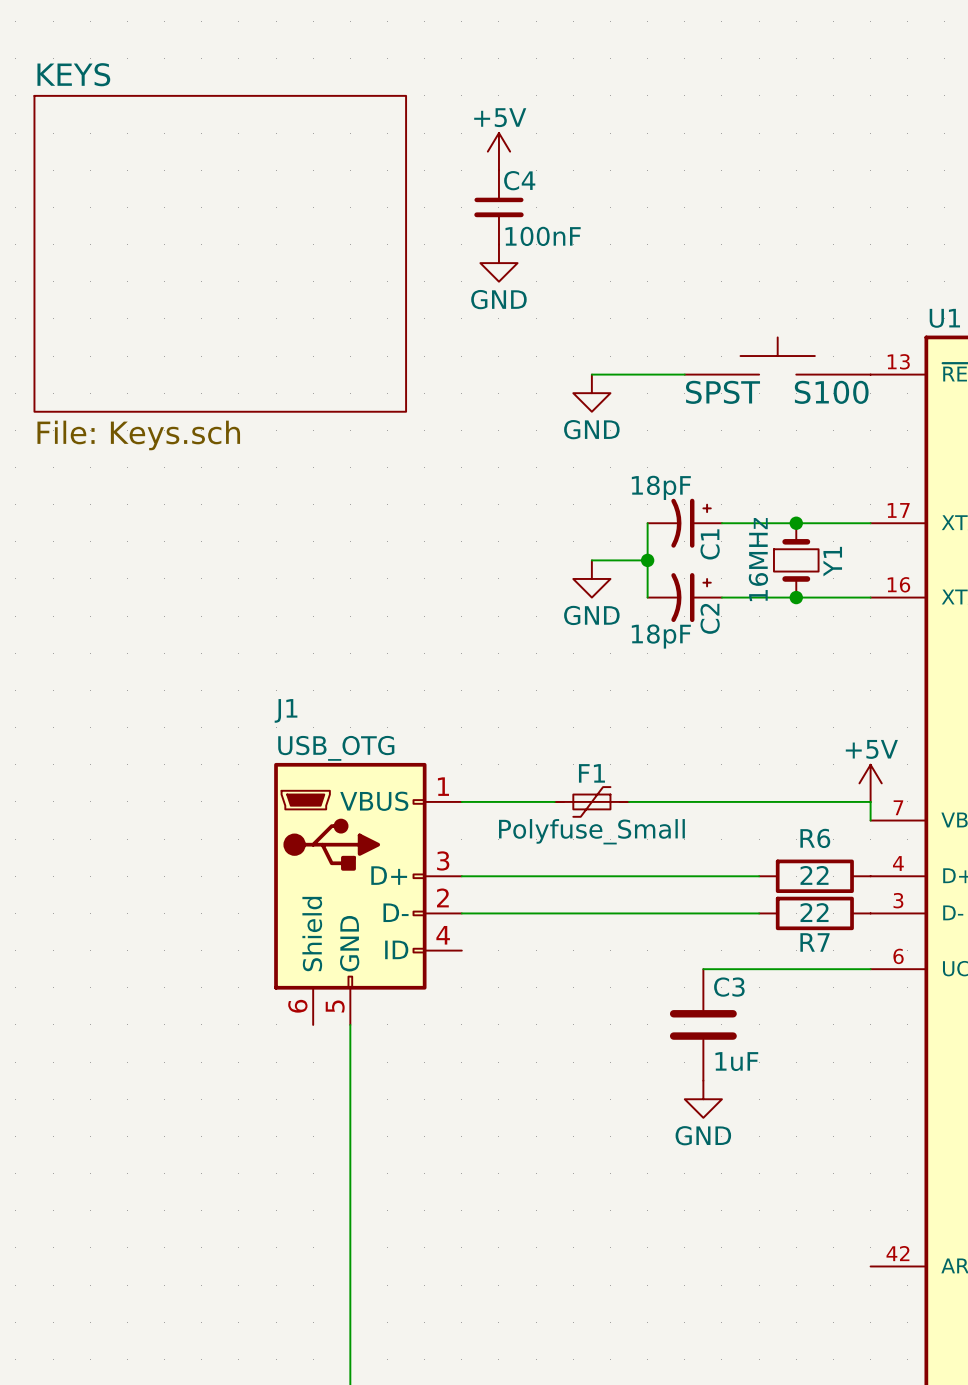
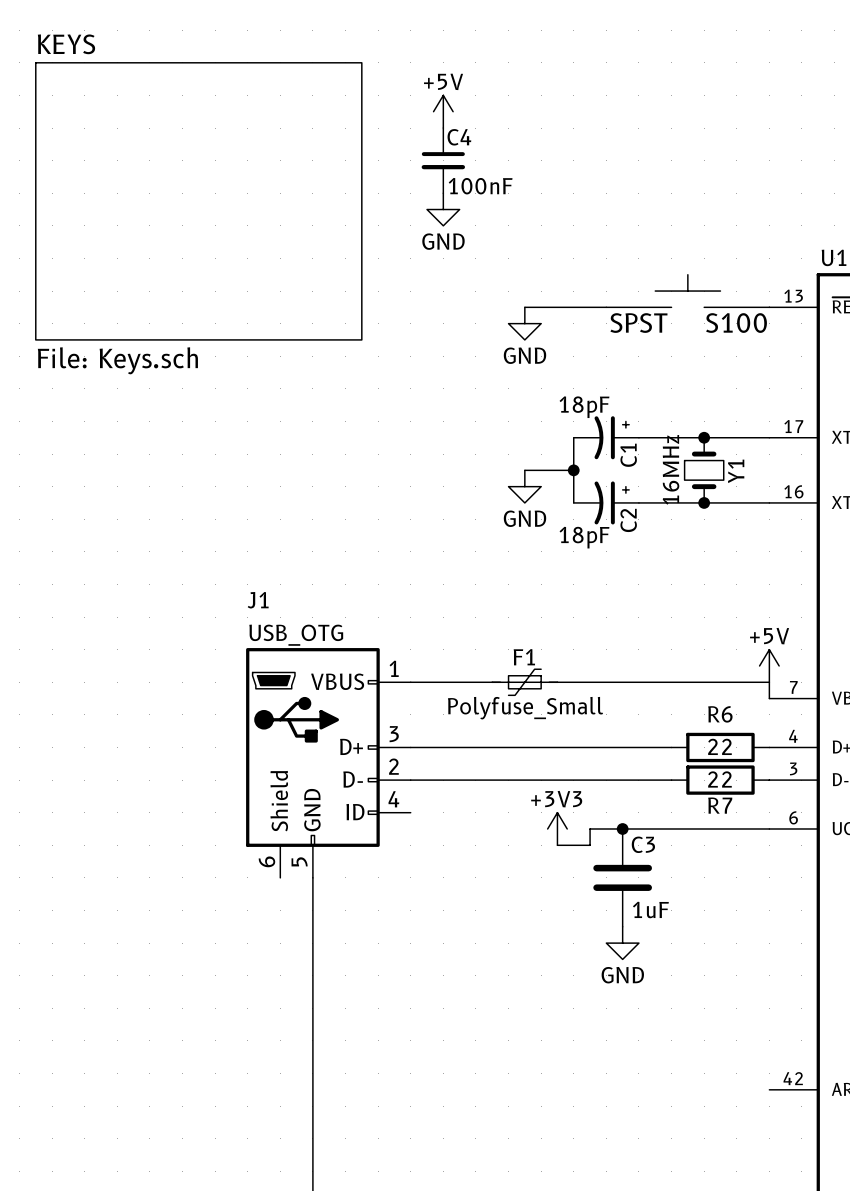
power symbol: none -> +3V3 (557, 828)
wire: none -> (622, 828) (590, 828) (590, 845) (557, 845)
junction: none -> (622, 828)

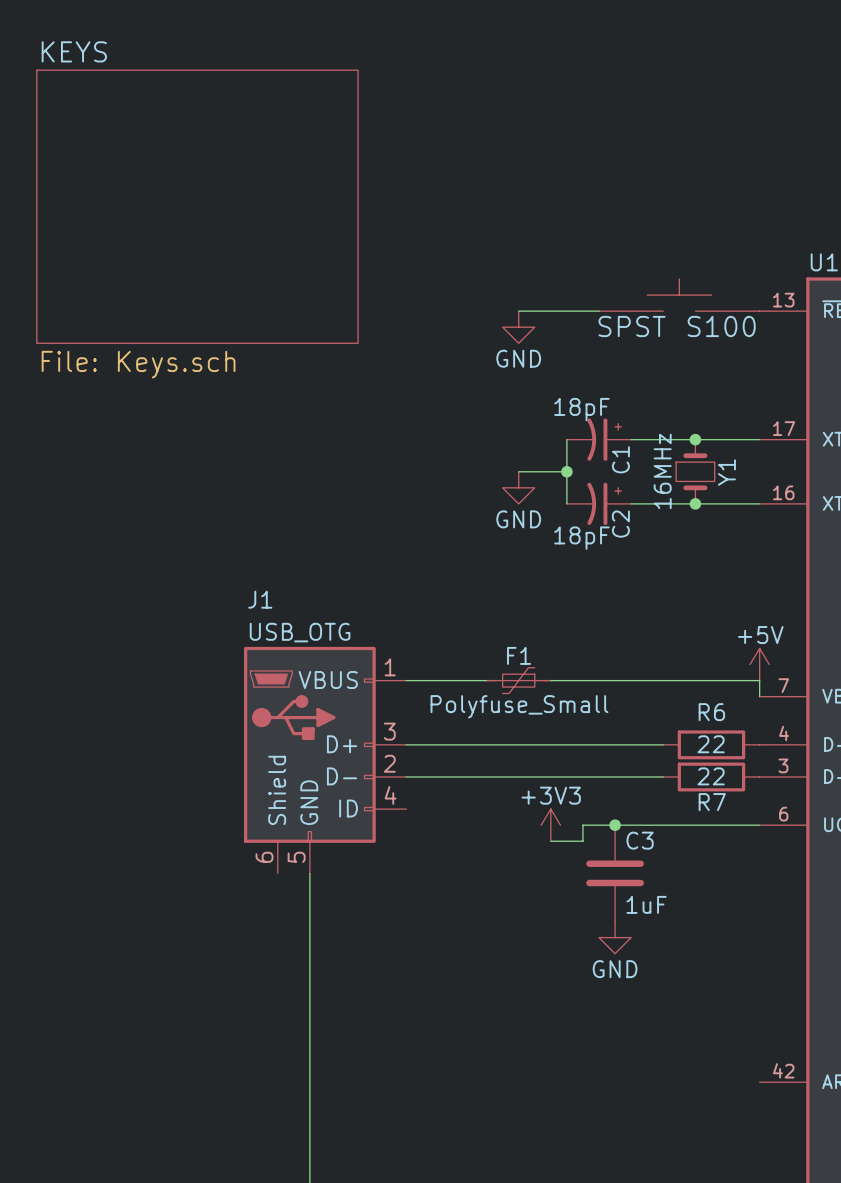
power symbol: +5V (443, 111) -> none
C4: 100nF (443, 160) -> none
power symbol: GND (443, 209) -> none

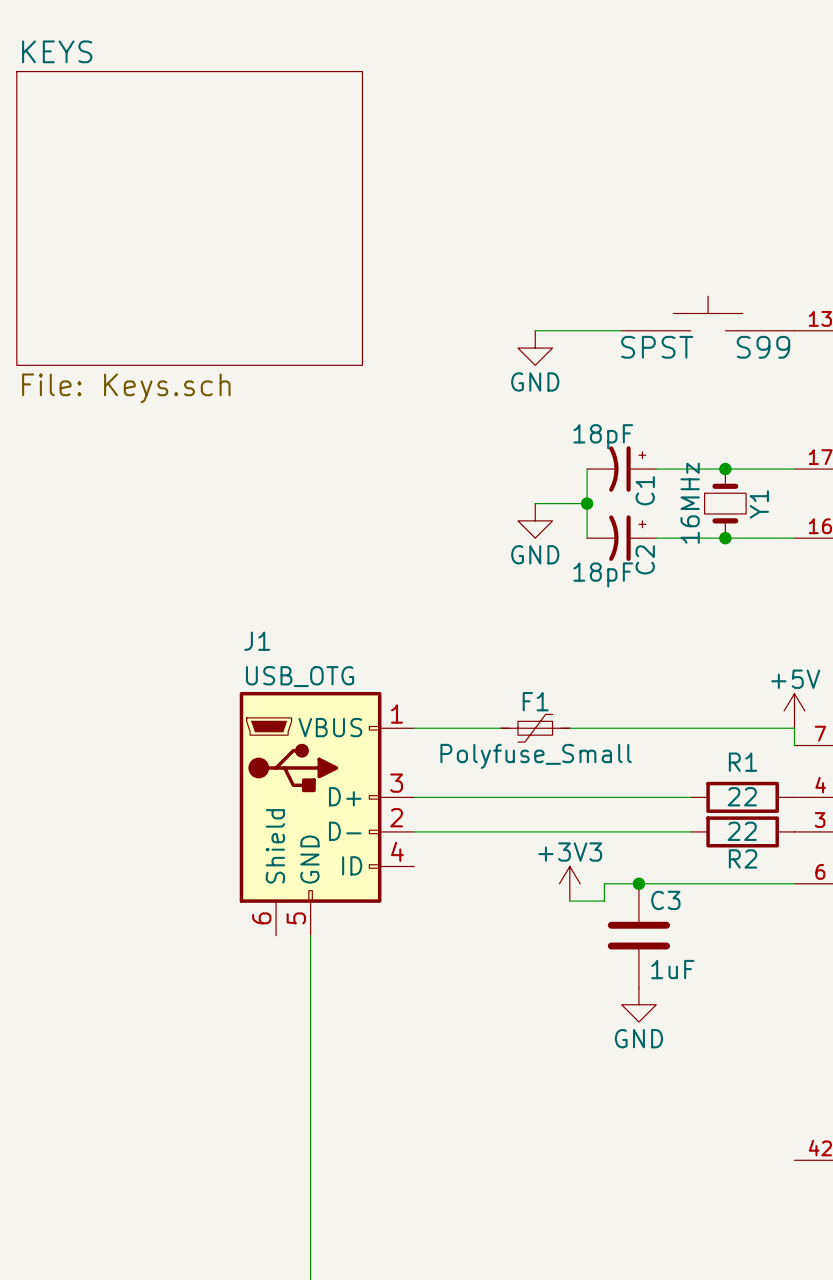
S100 name: S100 (721, 326) -> S99 (763, 347)
R6 name: R6 (711, 712) -> R1 (743, 762)
R7 name: R7 (712, 802) -> R2 (743, 858)

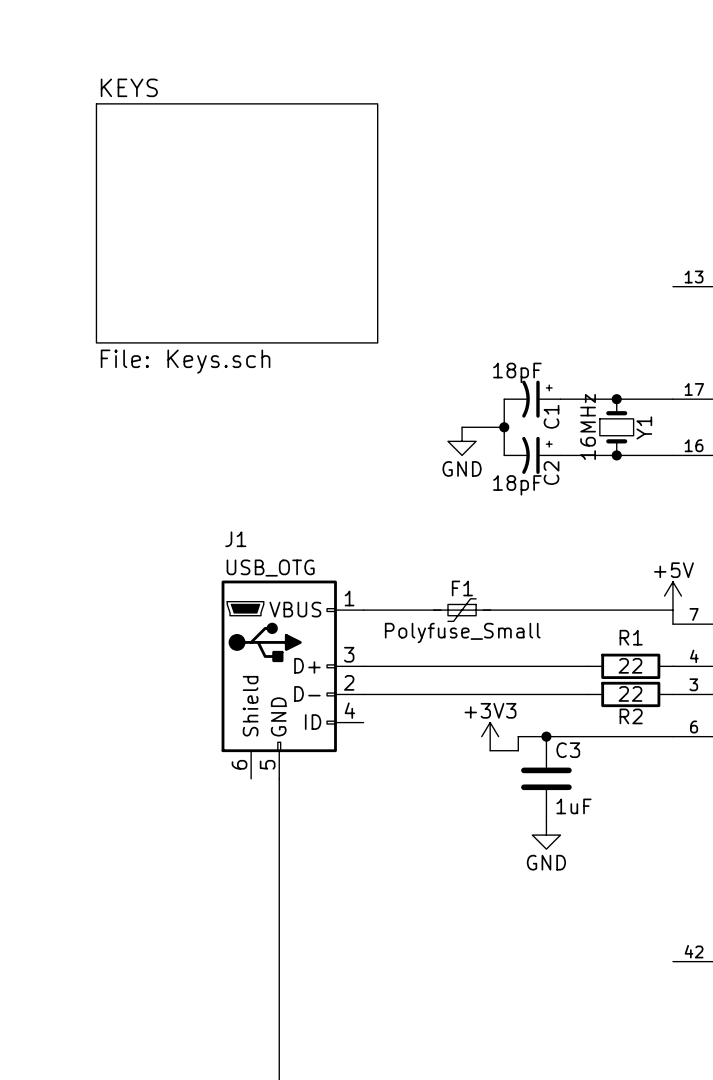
sheet KEYS position: (189, 218) -> (237, 223)
S99: SPST (708, 313) -> none
wire: (535, 330) (621, 330) -> none
power symbol: GND (535, 348) -> none

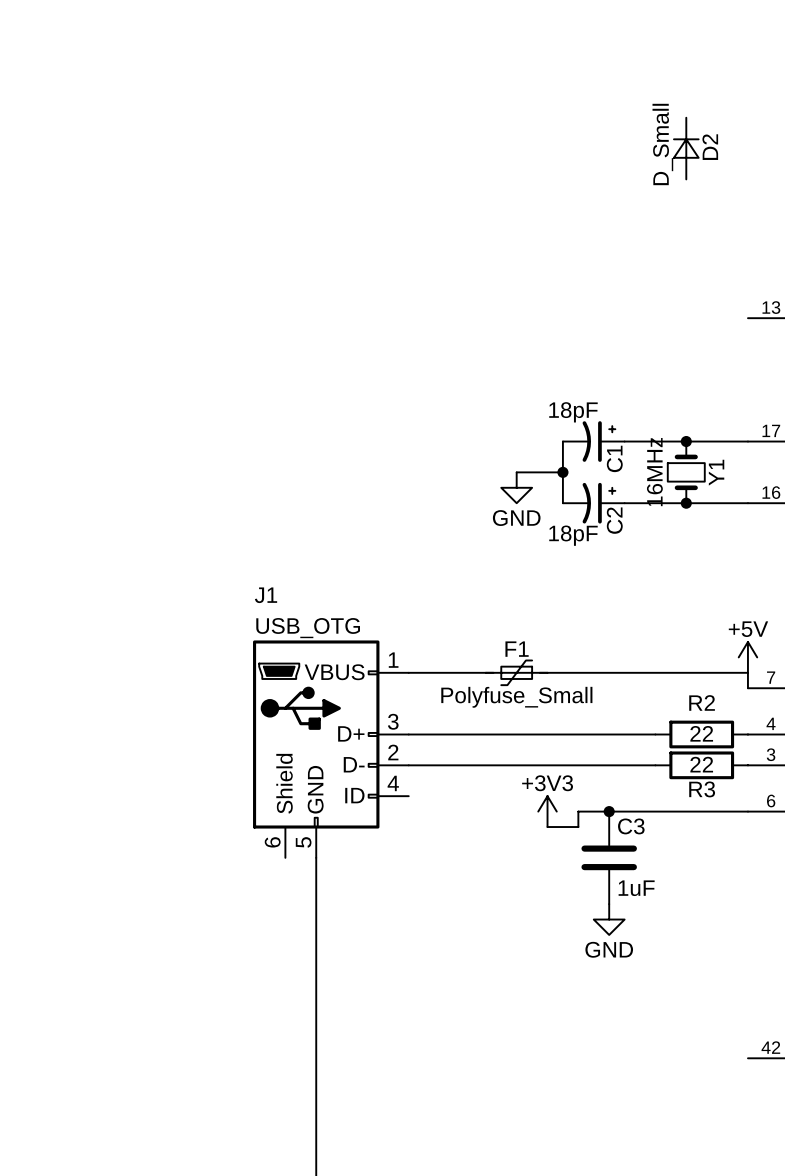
D2: none -> D_Small (686, 148)
sheet KEYS: File: Keys.sch (237, 223) -> none
R1 name: R1 (631, 637) -> R2 (702, 702)
R2 name: R2 (631, 716) -> R3 (702, 789)

